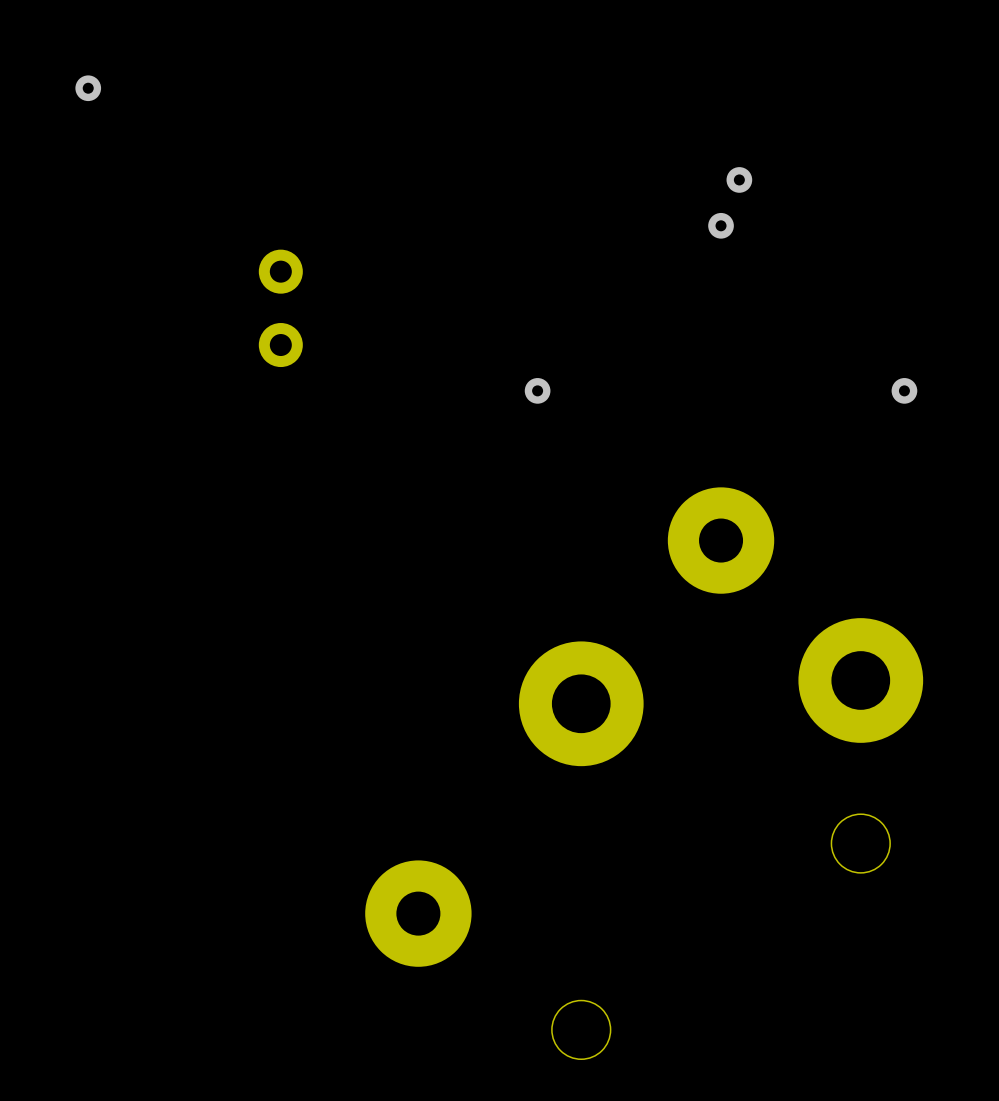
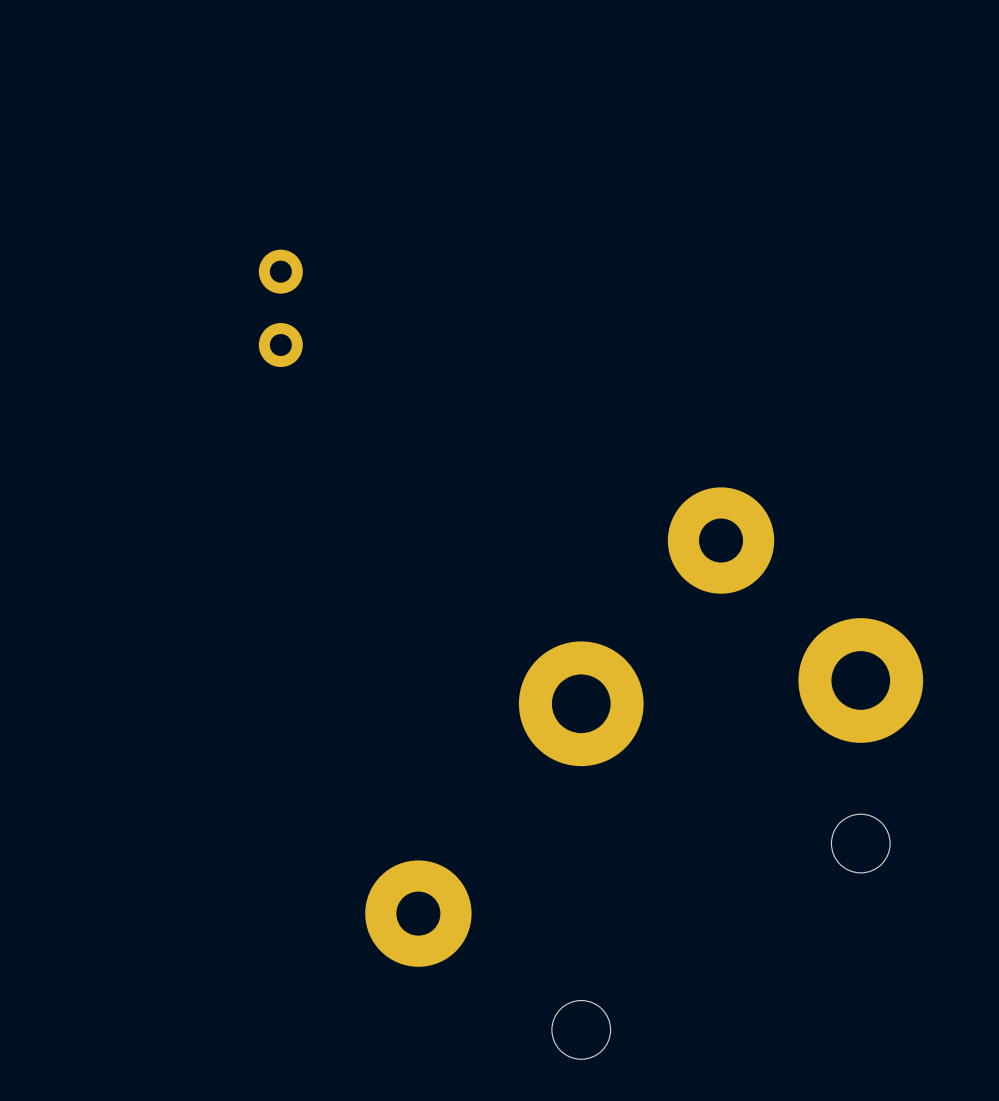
via: (88, 88) -> none
via: (739, 179) -> none
via: (721, 225) -> none
via: (537, 390) -> none
via: (904, 390) -> none

